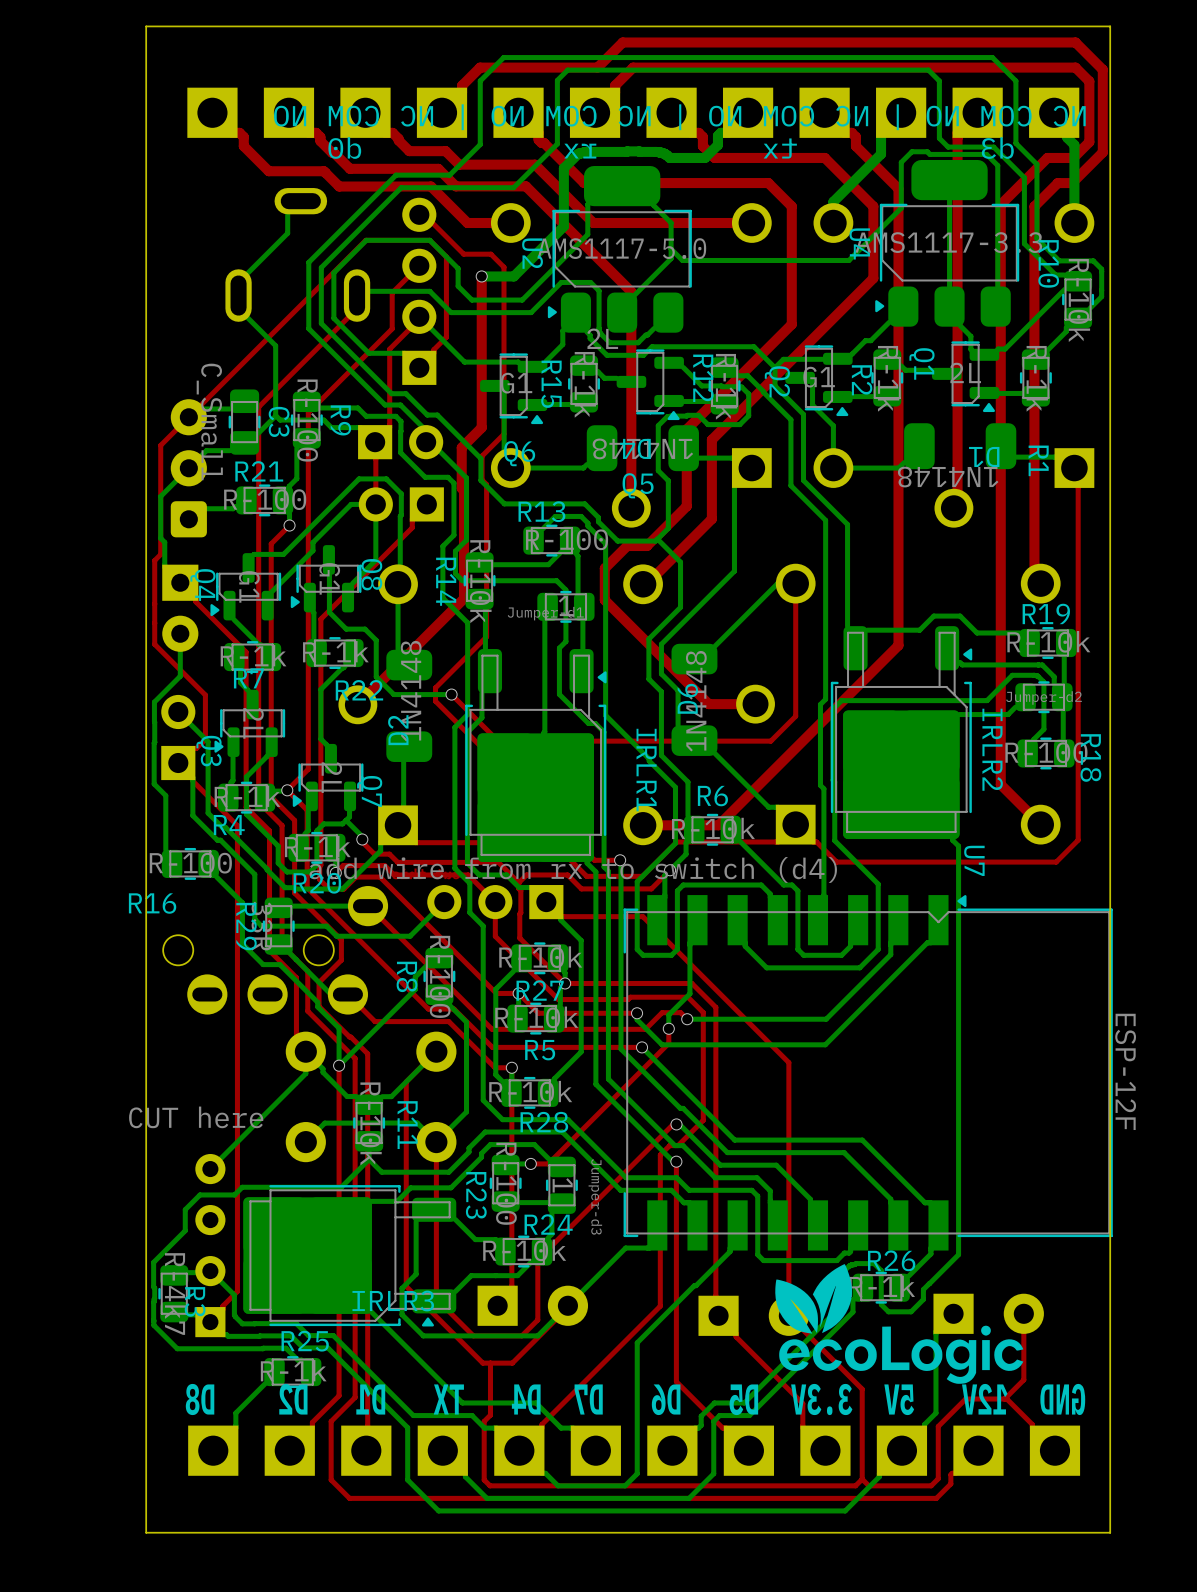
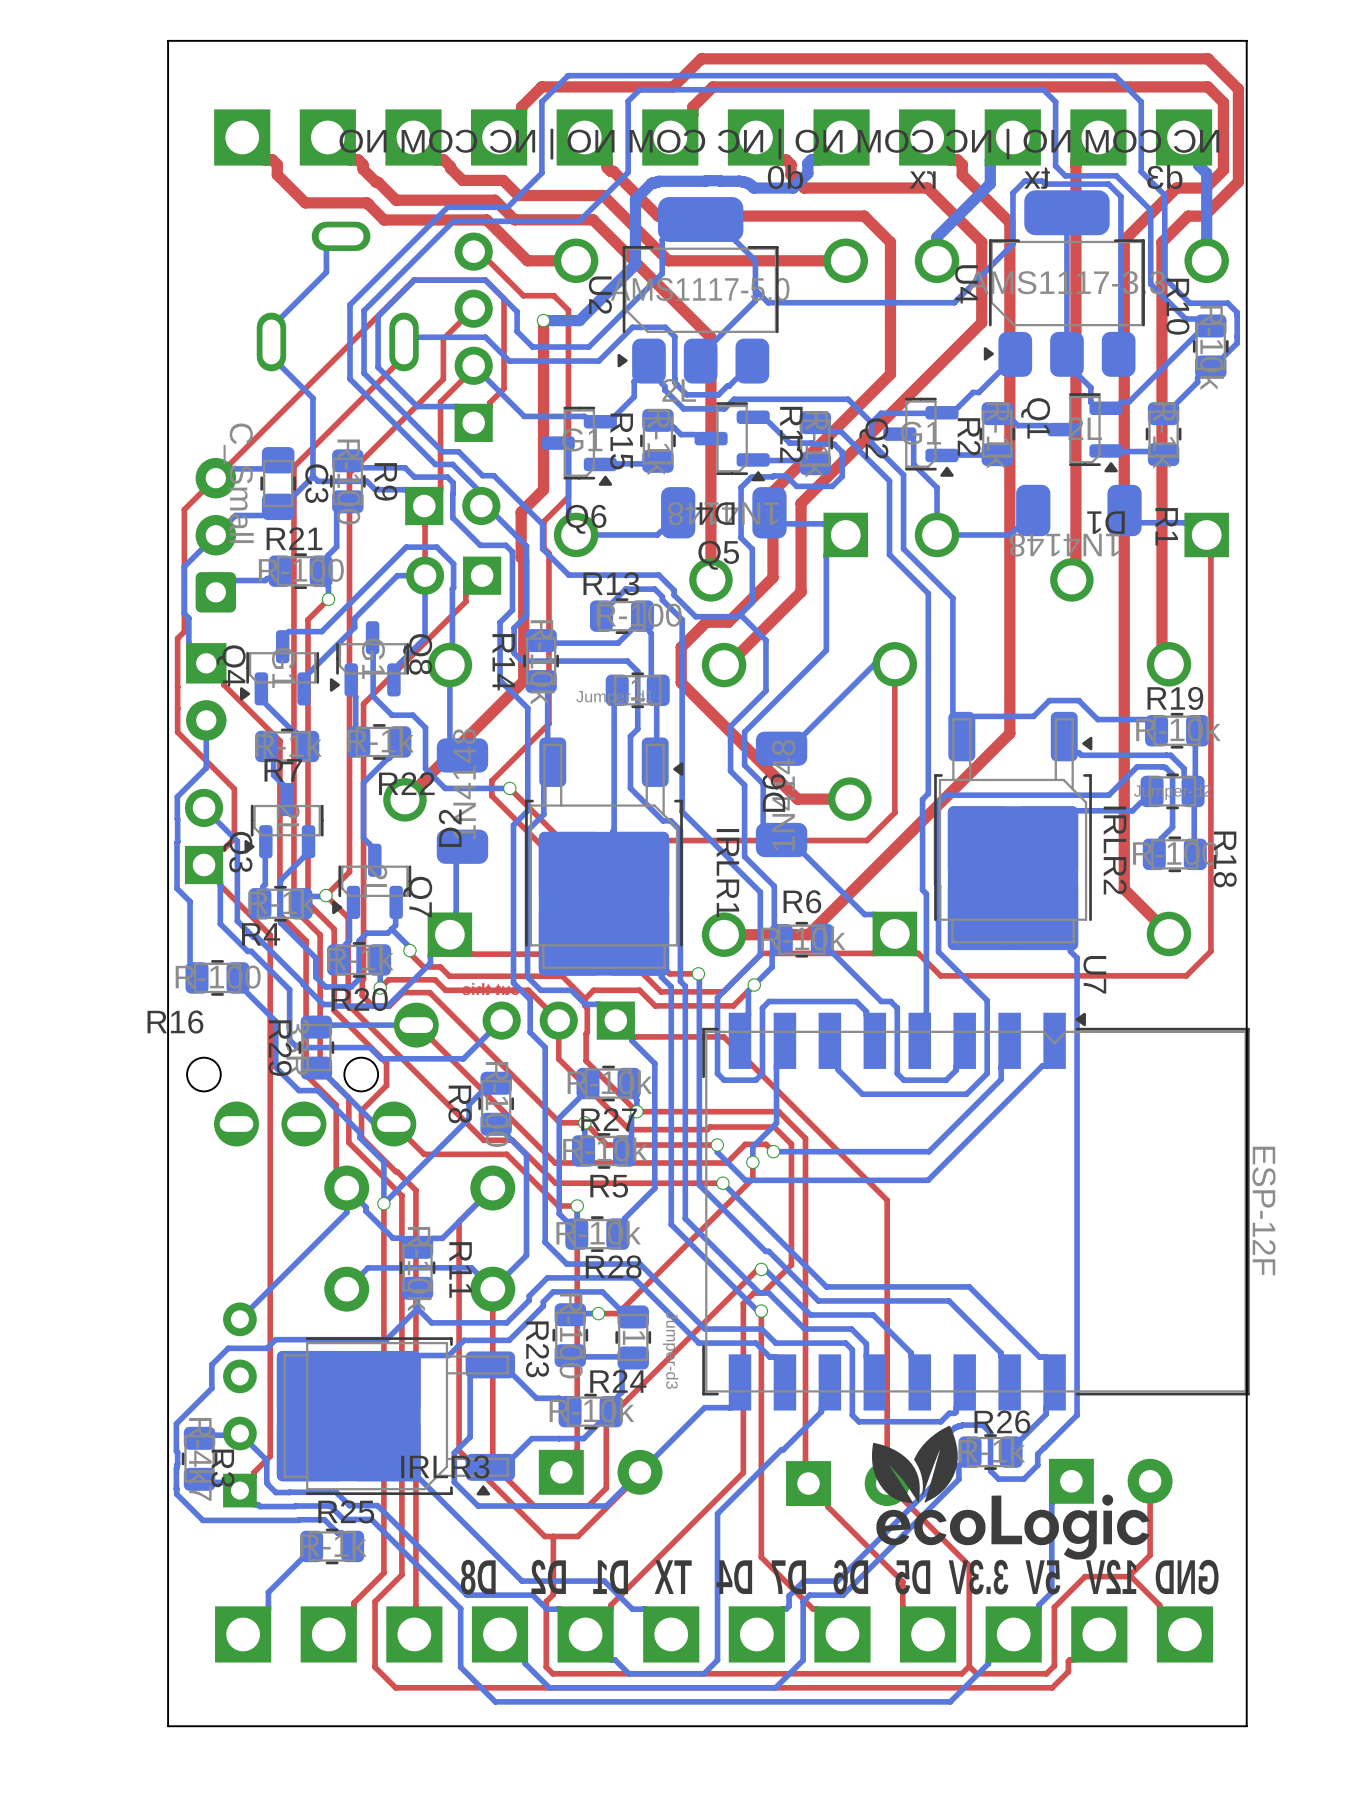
text: add wire from rx to switch (d4) (573, 869) -> none
text: CUT here (196, 1117) -> none

